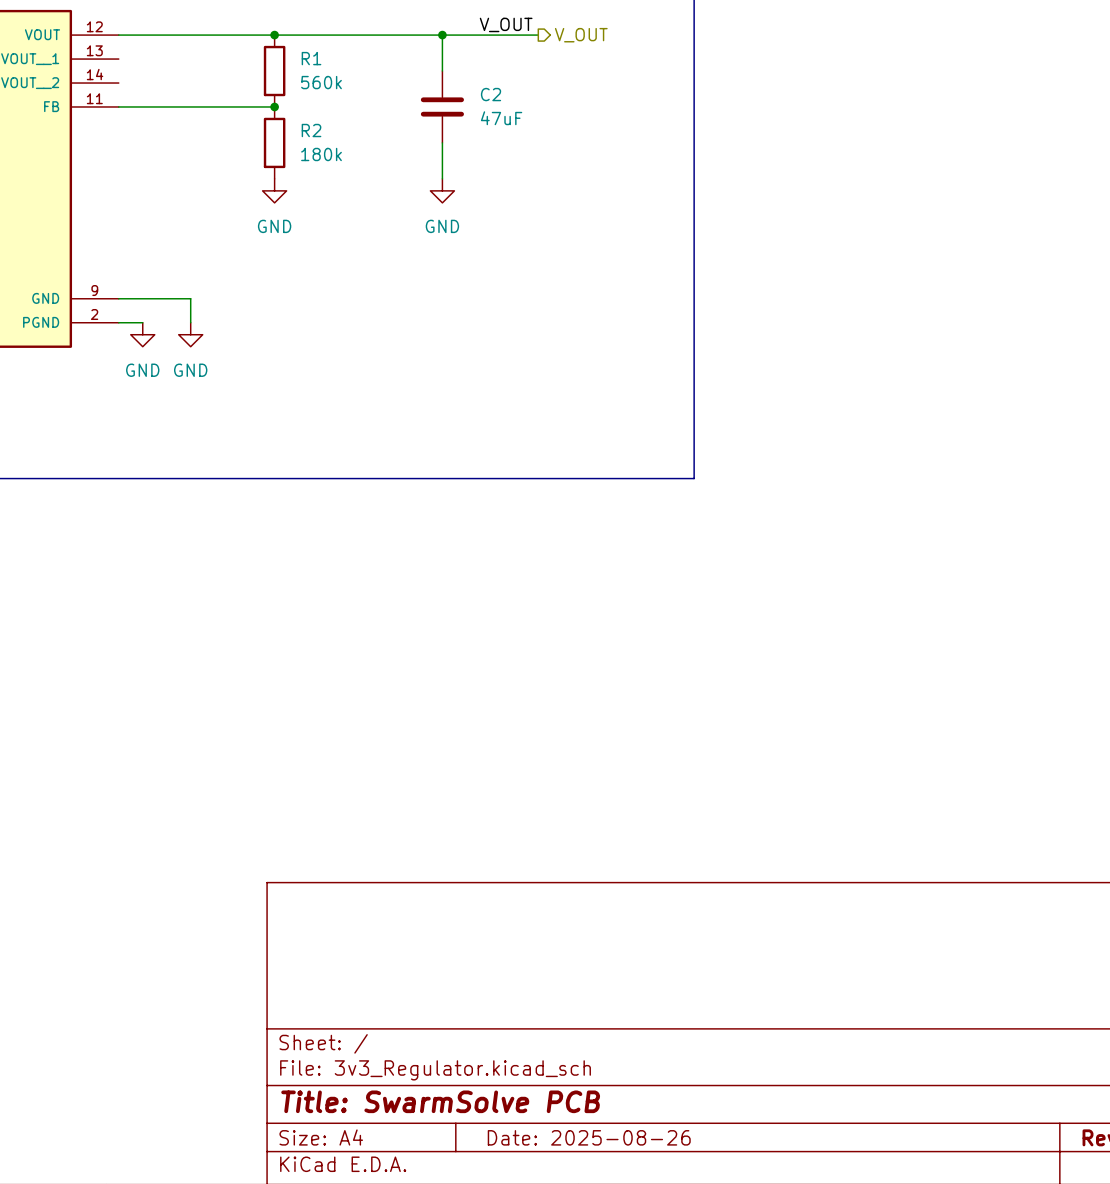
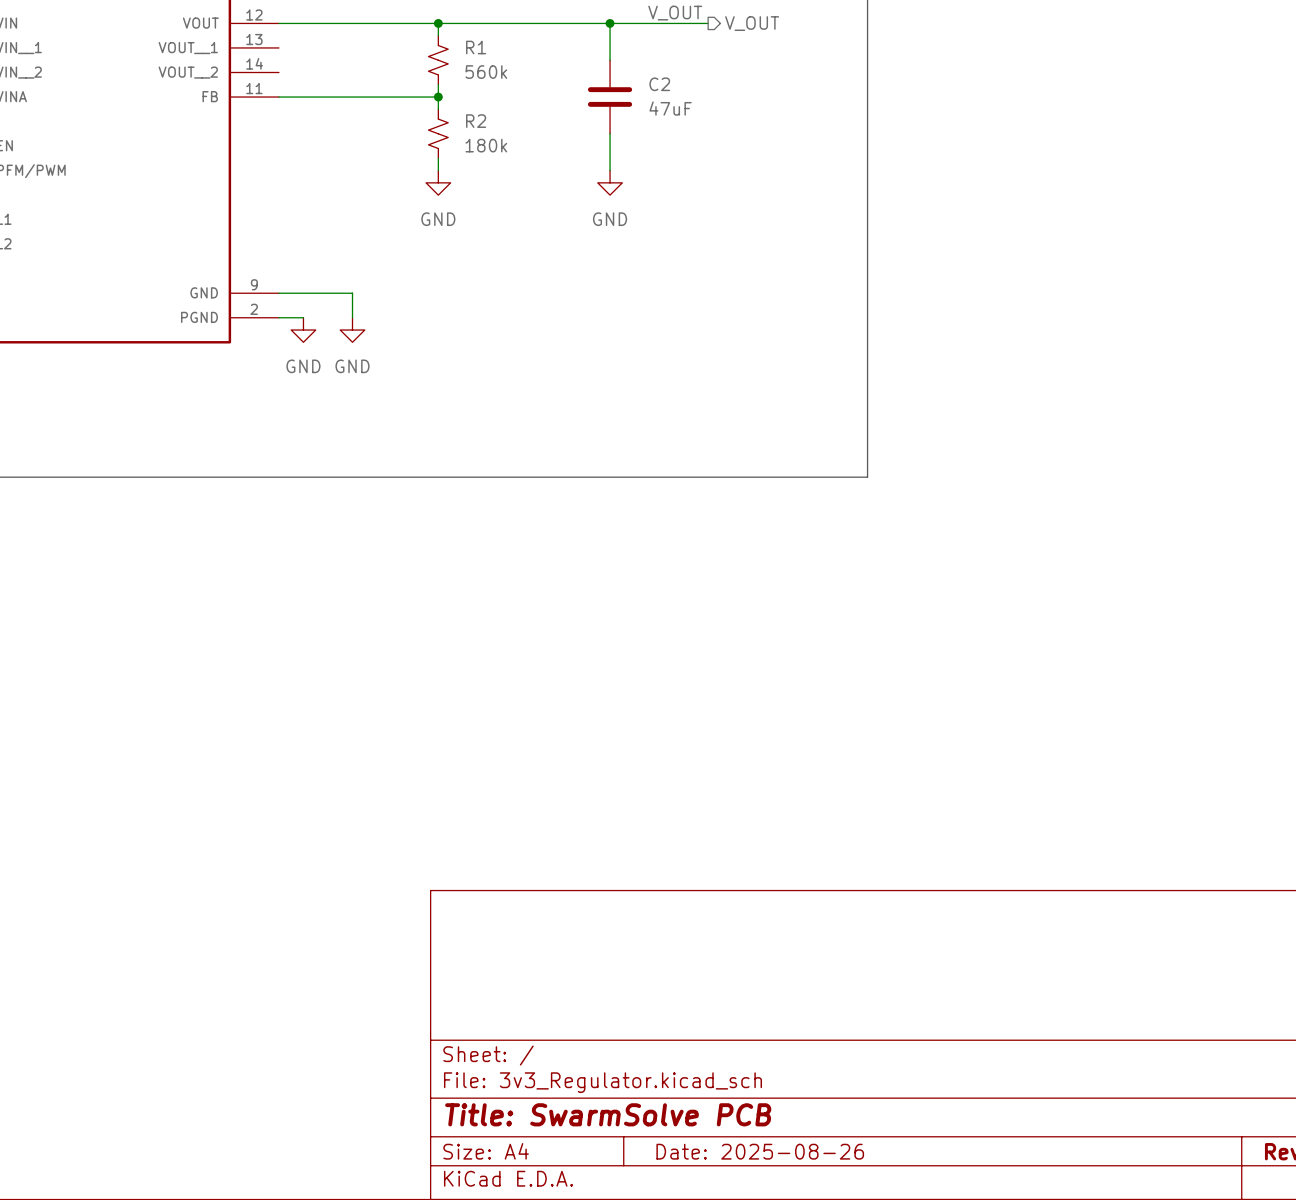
R1 symbol: [263, 35, 286, 107] -> [428, 35, 449, 85]
R2 symbol: [263, 106, 286, 179] -> [428, 109, 449, 159]

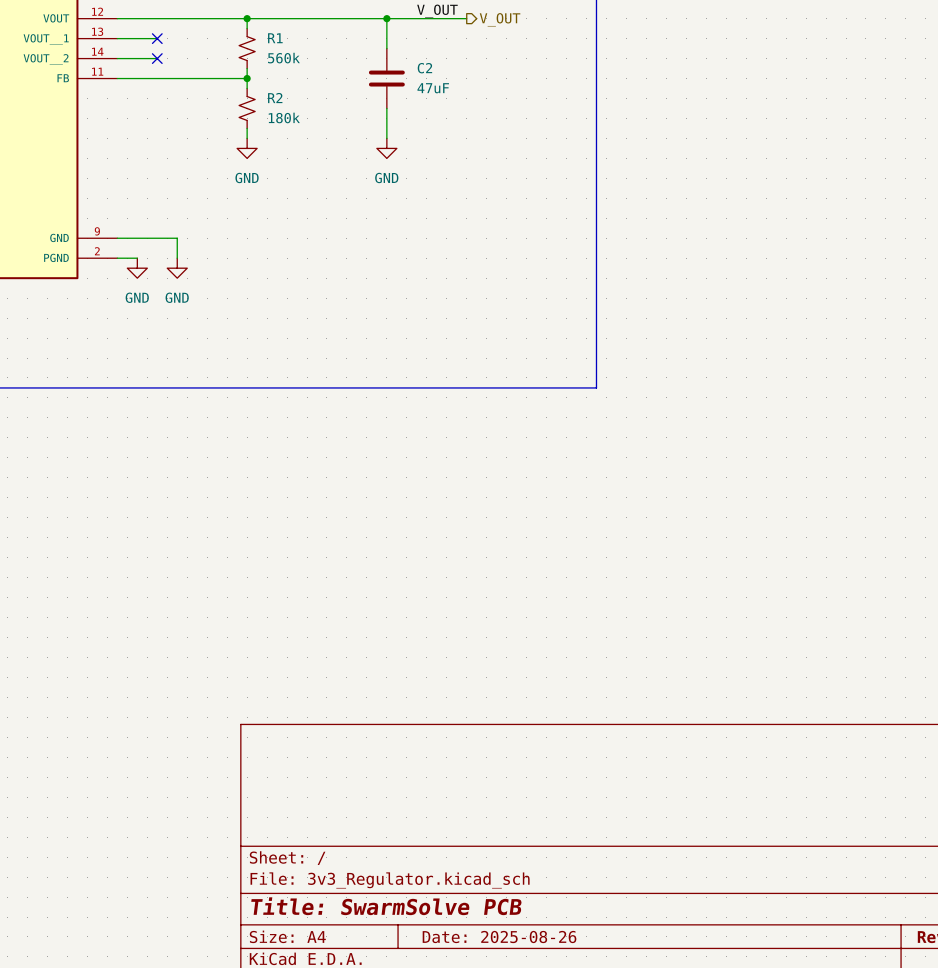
wire: none -> (117, 38) (157, 38)
no-connect mark: none -> (157, 38)
wire: none -> (117, 58) (157, 58)
no-connect mark: none -> (157, 58)

